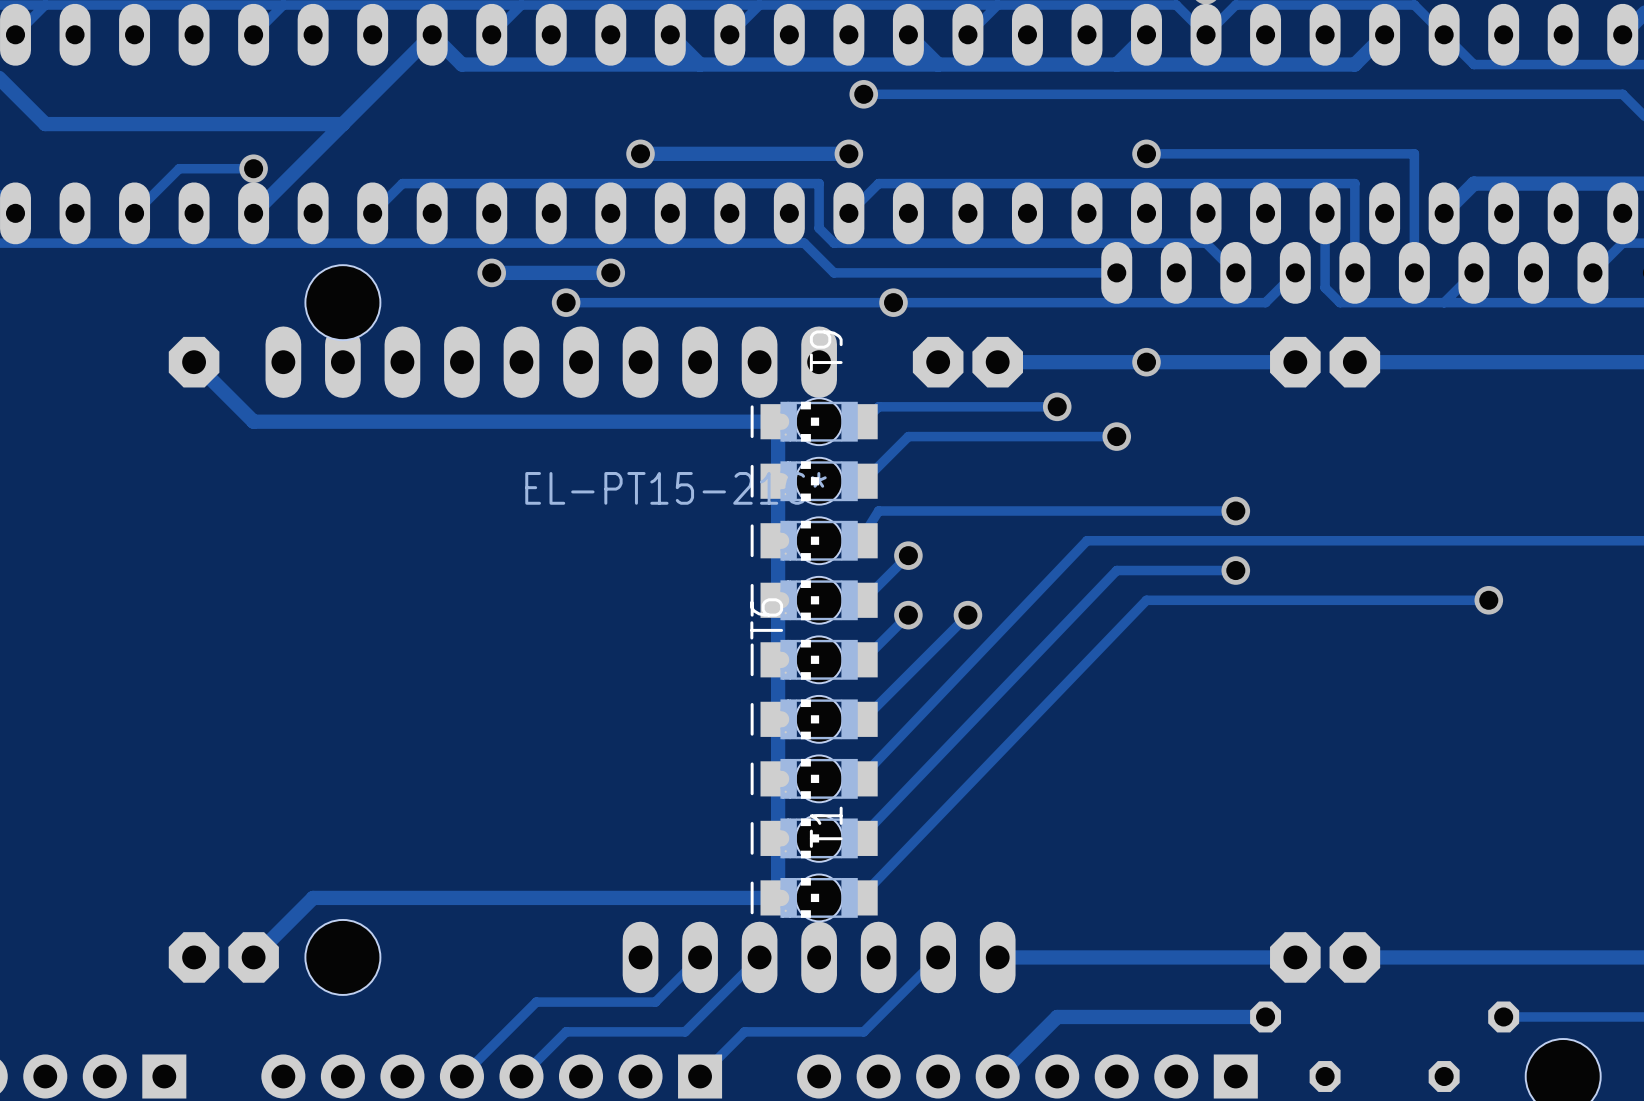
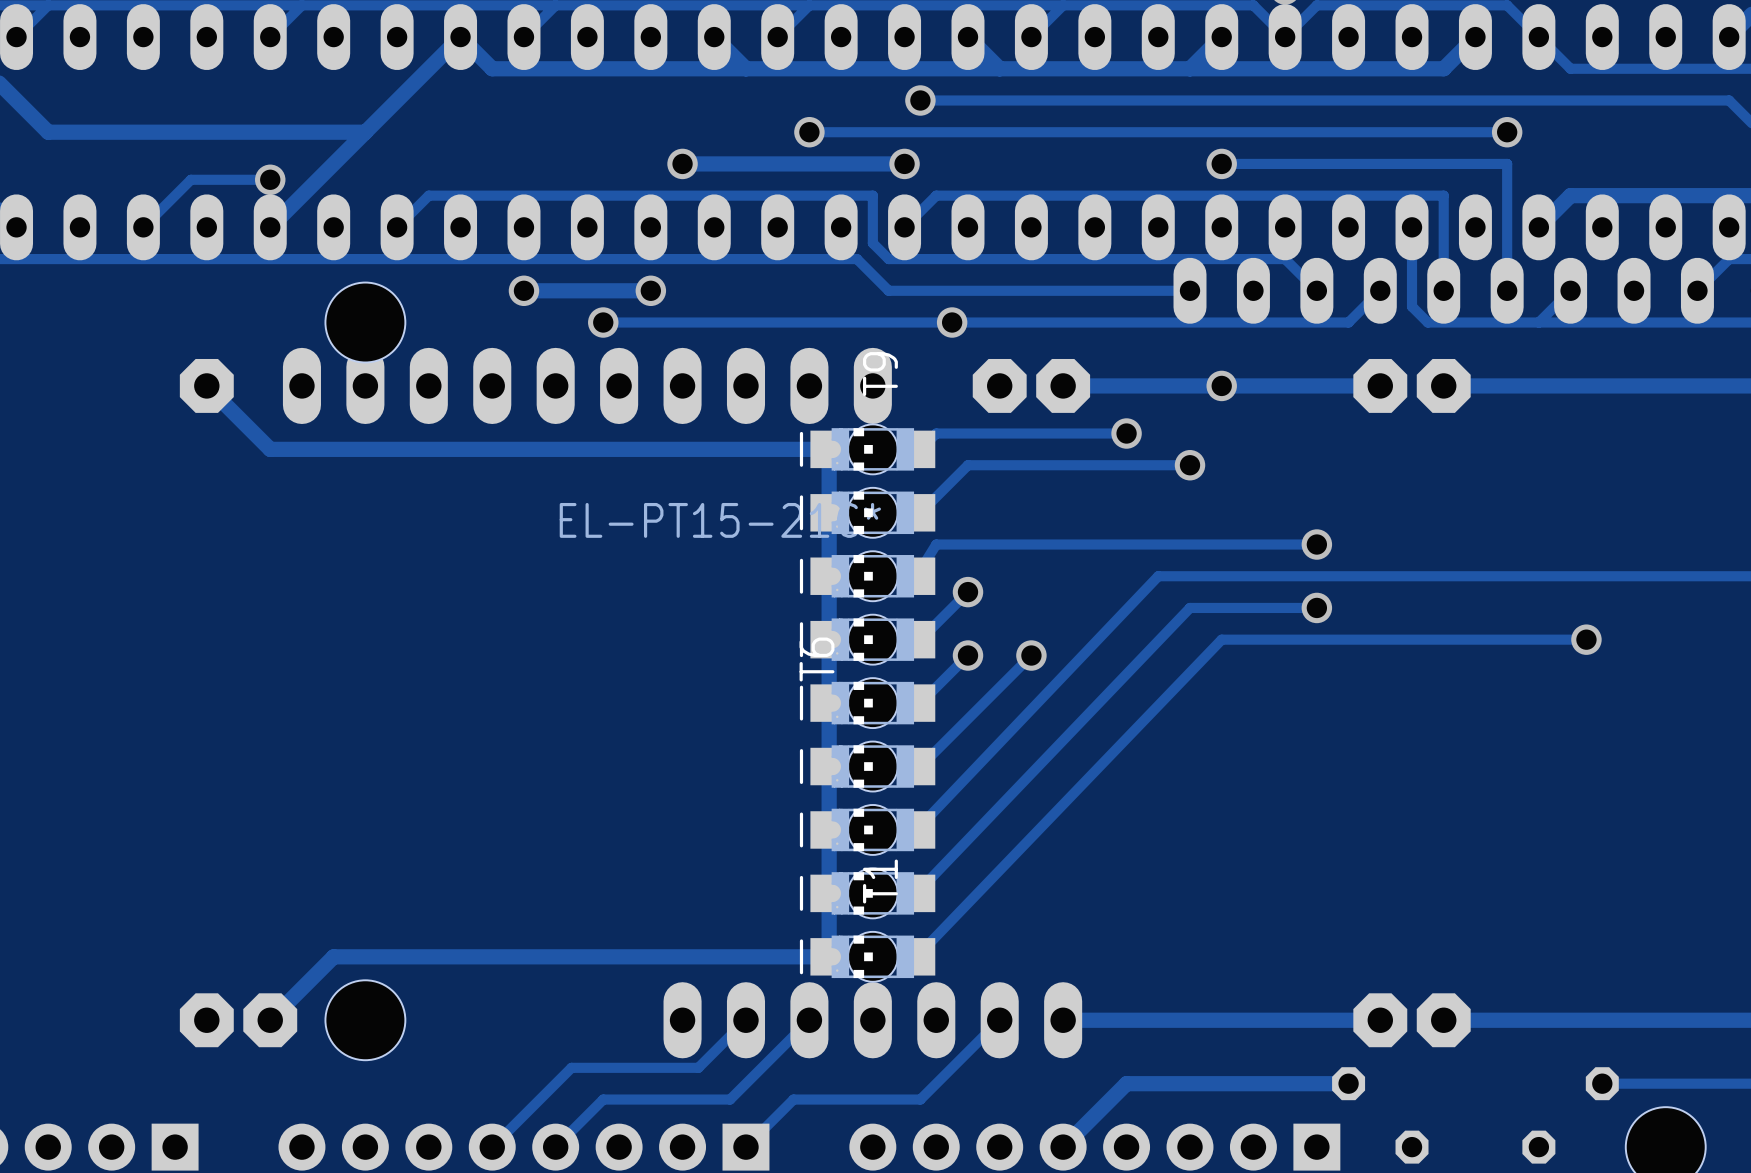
via: none -> (809, 132)
track: none -> (1507, 132) (809, 132)
via: none -> (1507, 132)

